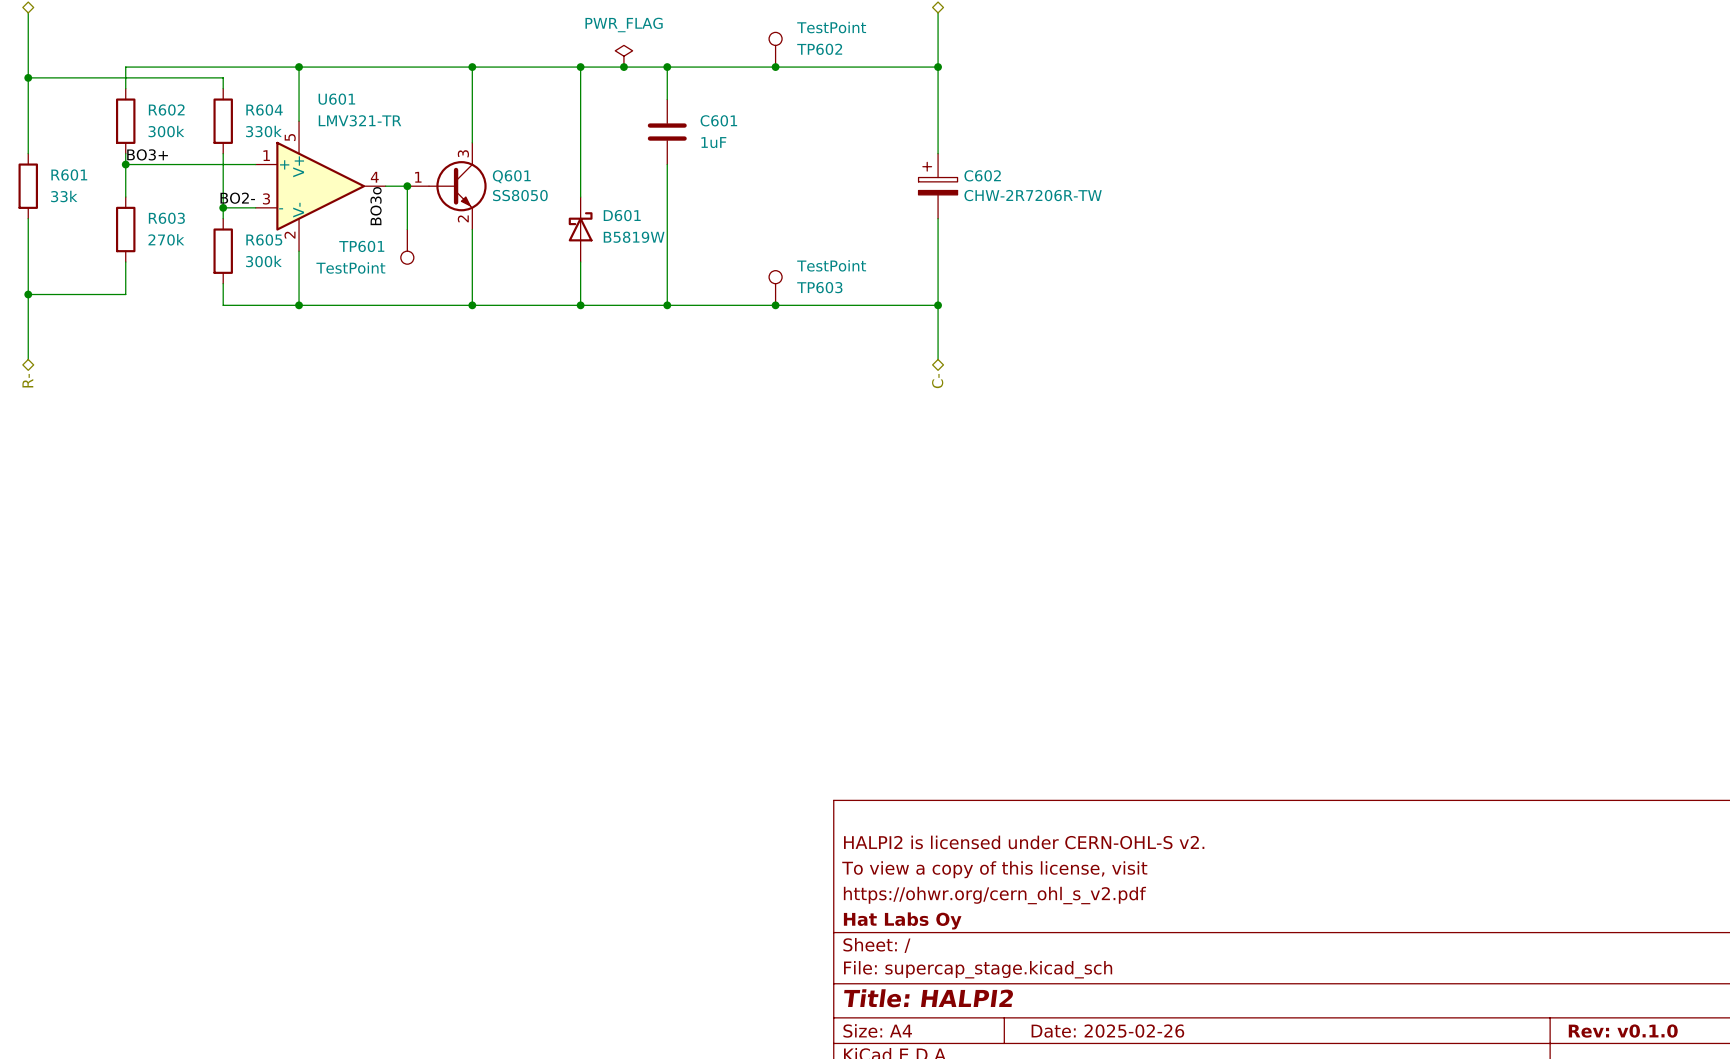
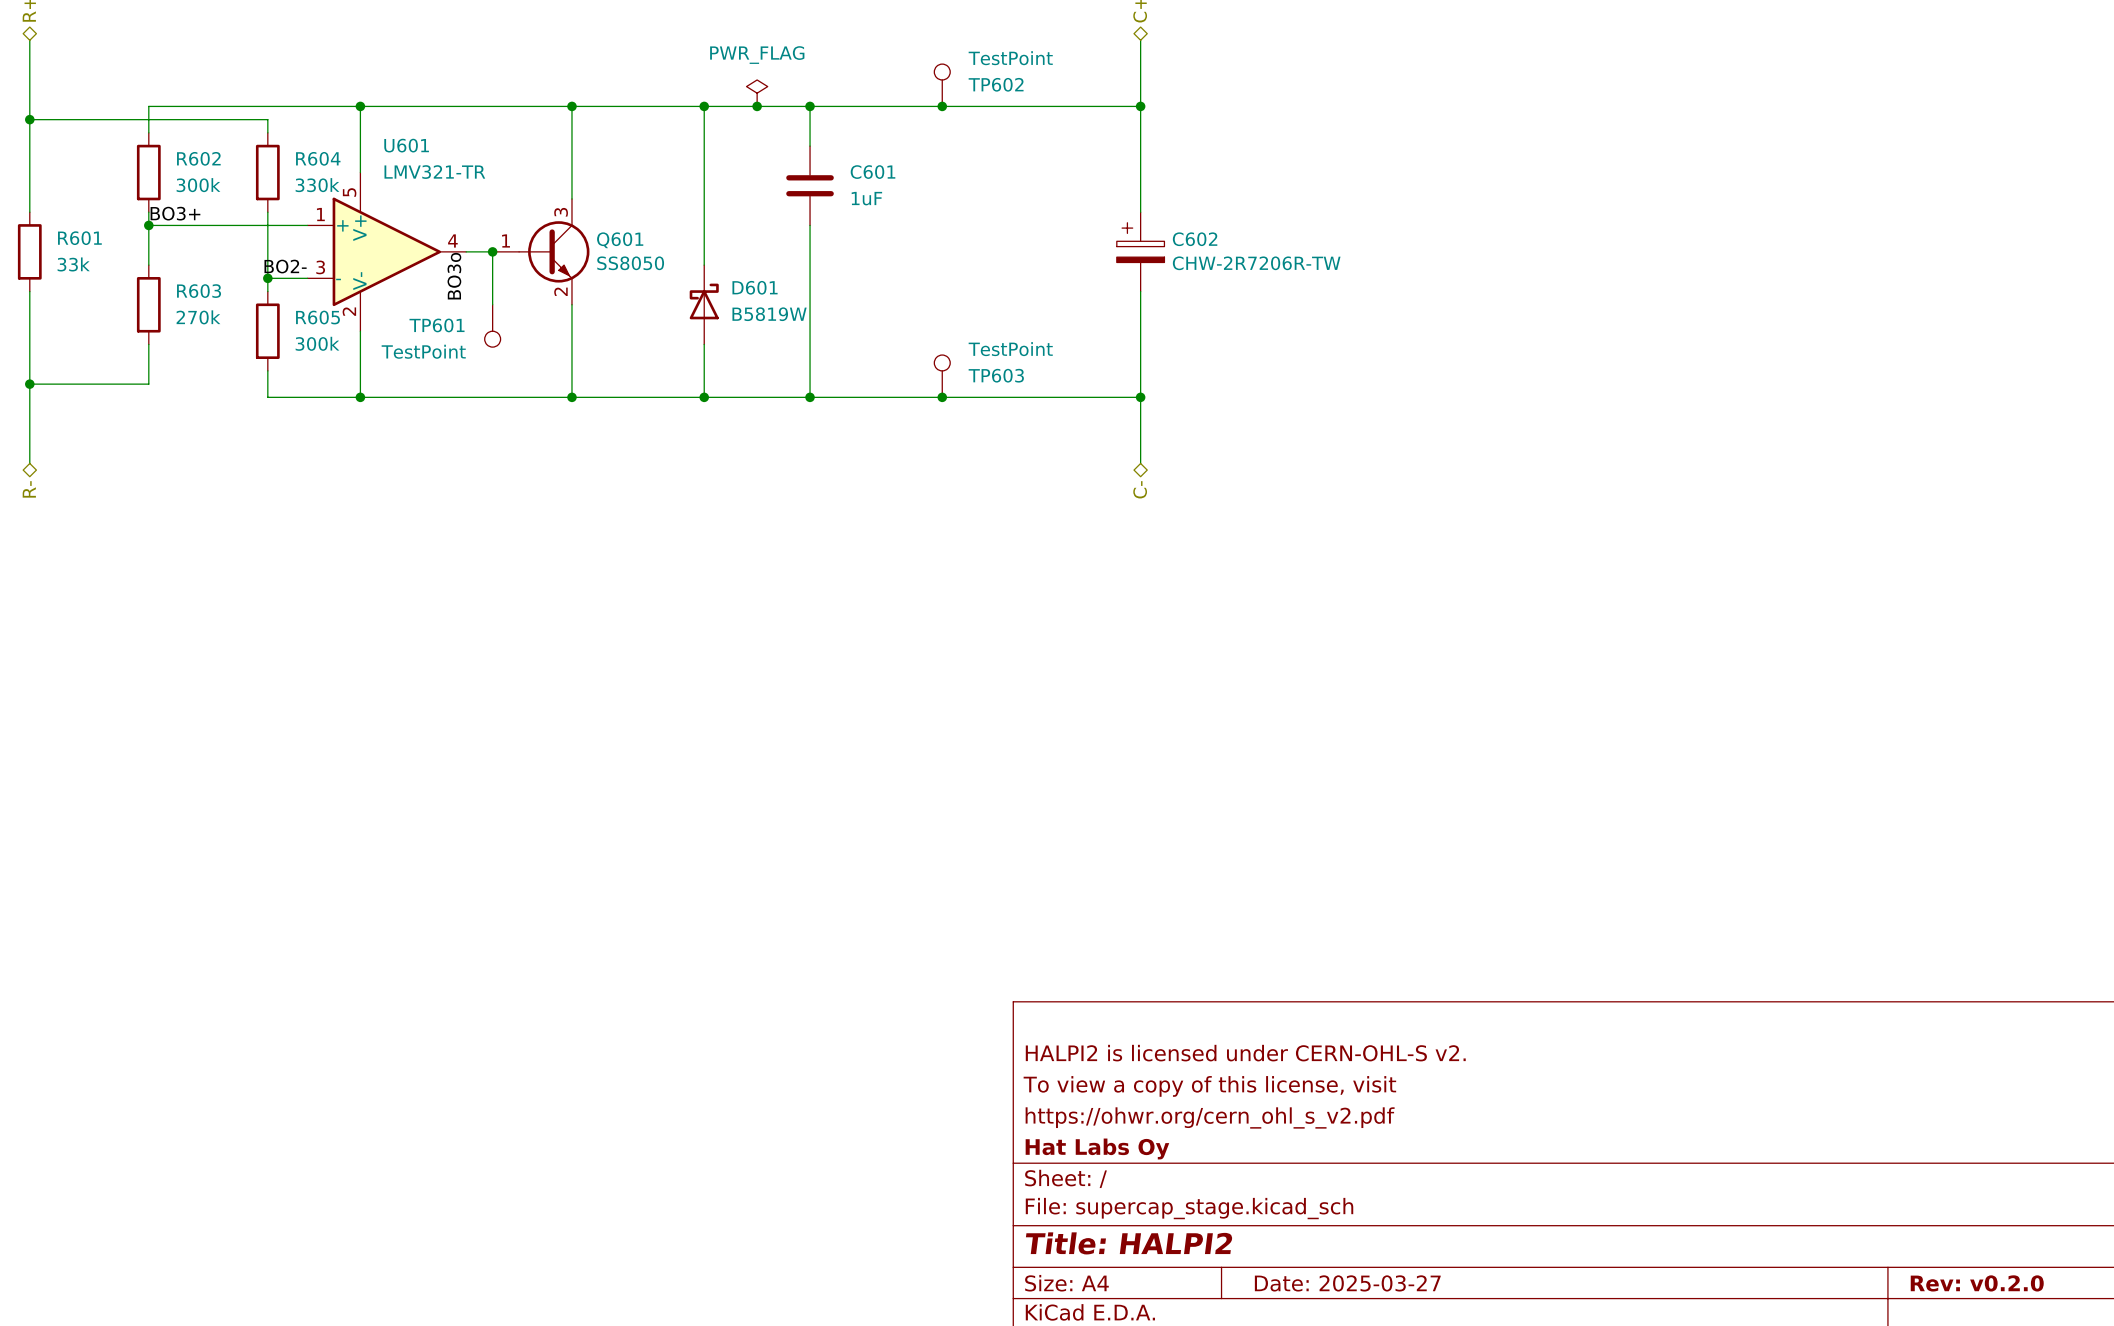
title block: Date: 2025-02-26 (1107, 1031) -> Date: 2025-03-27 (1347, 1283)
title block: Rev: v0.1.0 (1623, 1031) -> Rev: v0.2.0 (1977, 1283)

